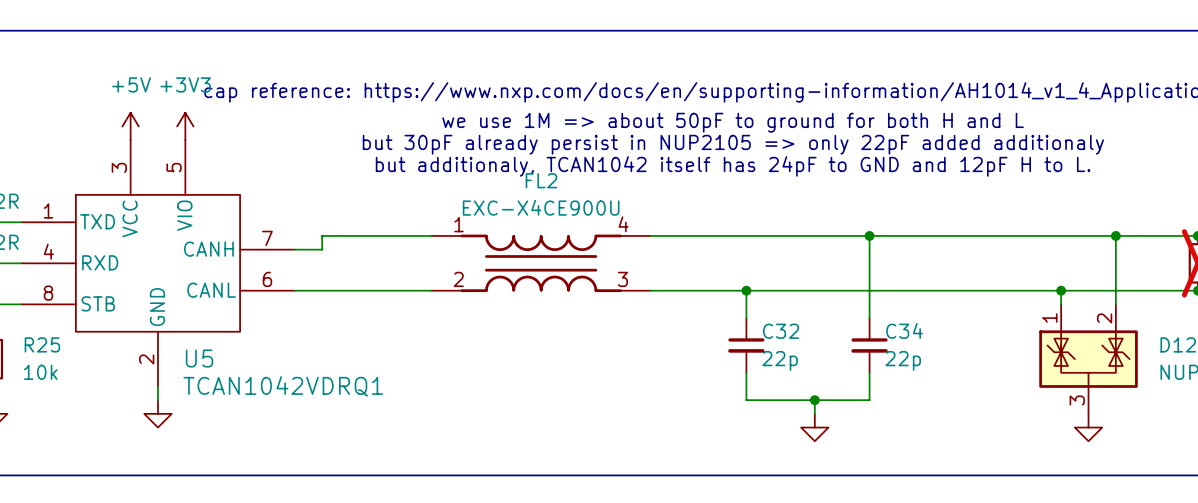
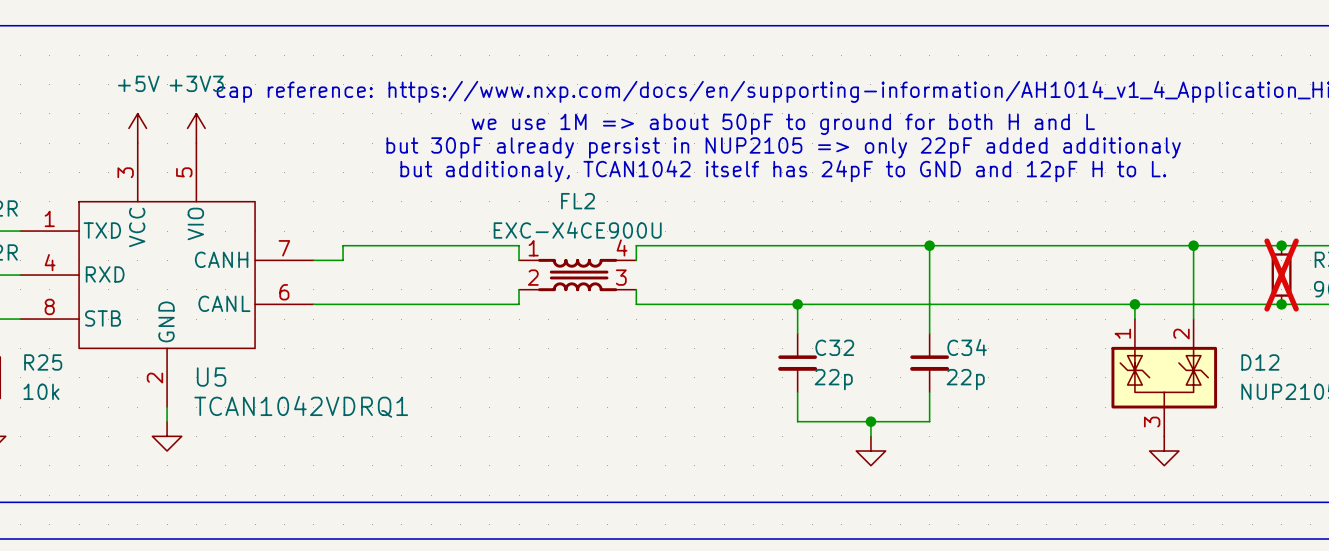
FL2 symbol: [431, 234, 651, 293] -> [519, 258, 637, 292]

